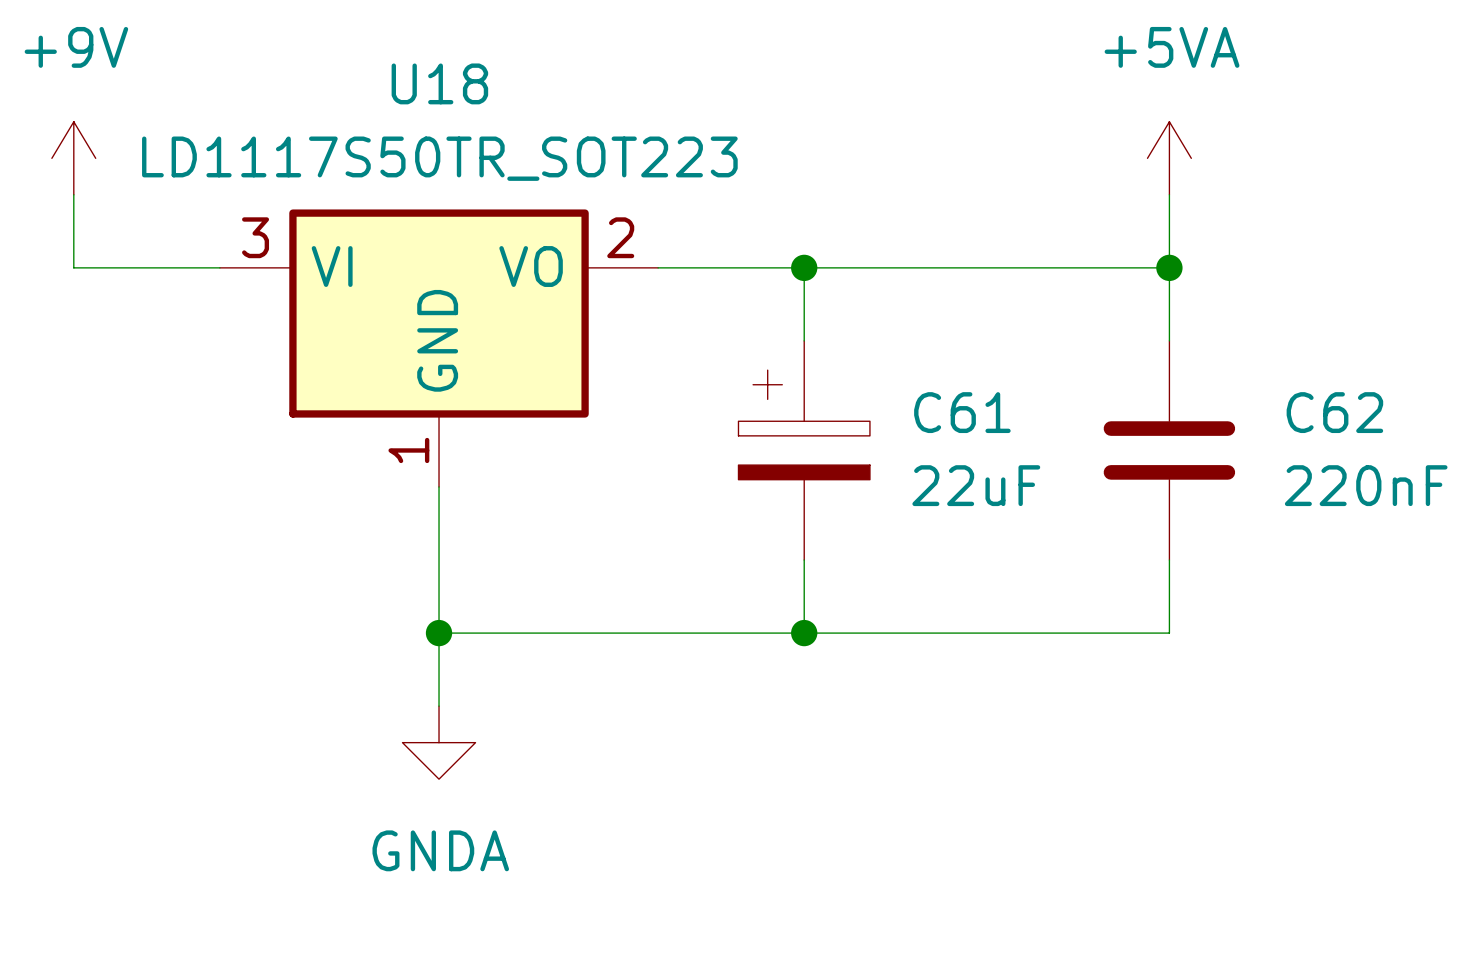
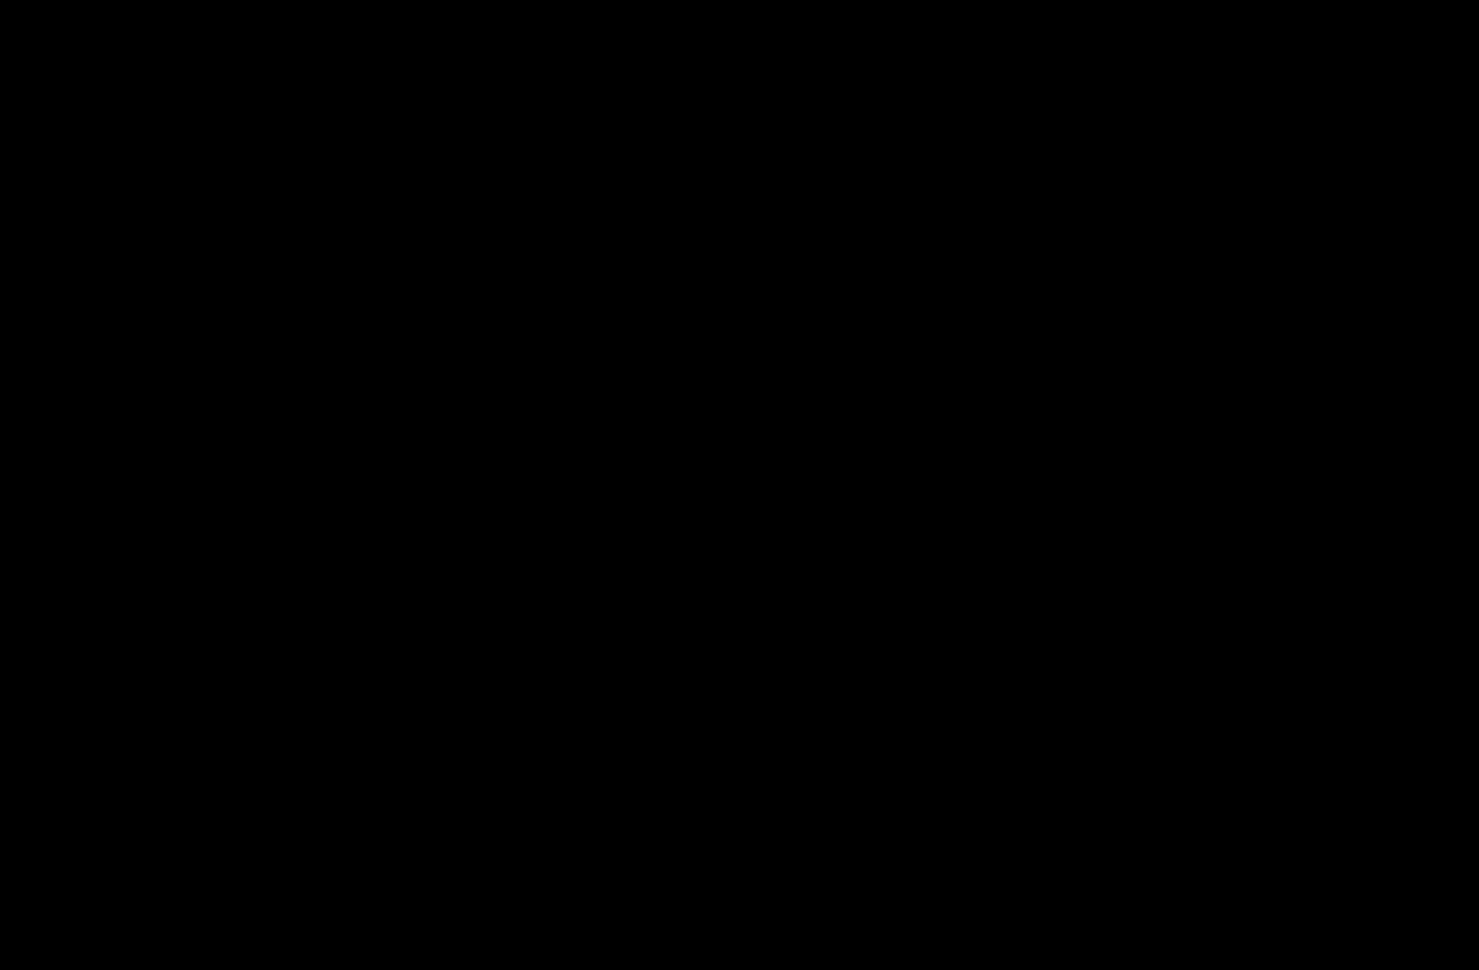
power symbol: +9V (73, 158) -> none
power symbol: +5VA (1169, 158) -> none
wire: (73, 194) (73, 267) (219, 267) -> none
wire: (1169, 194) (1169, 340) -> none
wire: (658, 267) (1169, 267) -> none
wire: (804, 267) (804, 340) -> none
junction: (804, 267) -> none
junction: (1169, 267) -> none
U18: LD1117S50TR_SOT223 (439, 348) -> none
C61: 22uF (804, 450) -> none
C62: 220nF (1169, 450) -> none
wire: (439, 487) (439, 706) -> none
wire: (804, 560) (804, 633) -> none
wire: (1169, 560) (1169, 633) (439, 633) -> none
junction: (439, 633) -> none
junction: (804, 633) -> none
power symbol: GNDA (439, 742) -> none

